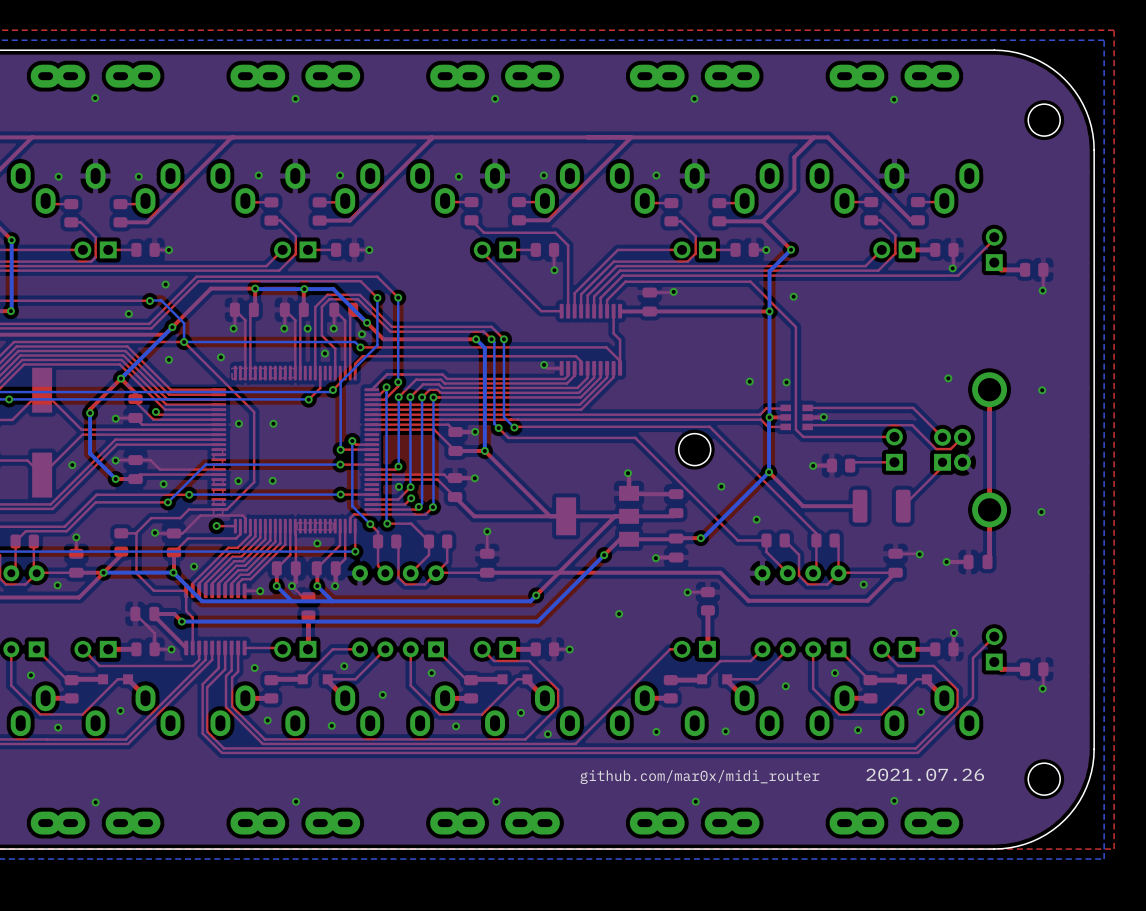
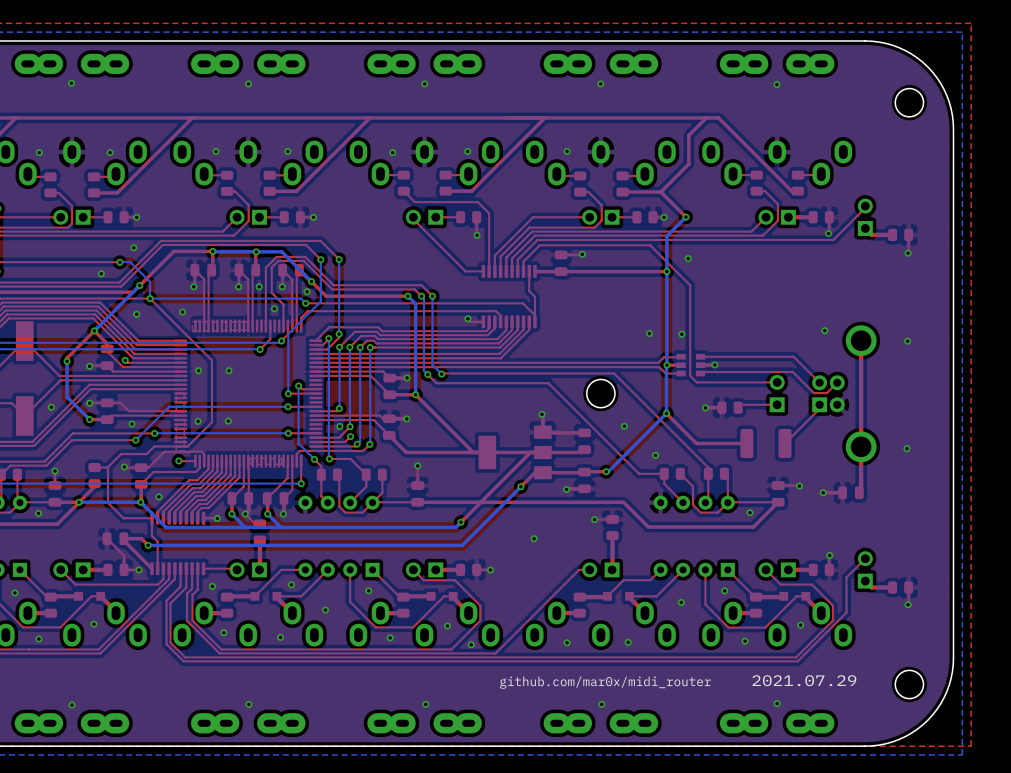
via: (317, 543) -> none
text: 2021.07.26 (925, 774) -> 2021.07.29 (804, 680)

